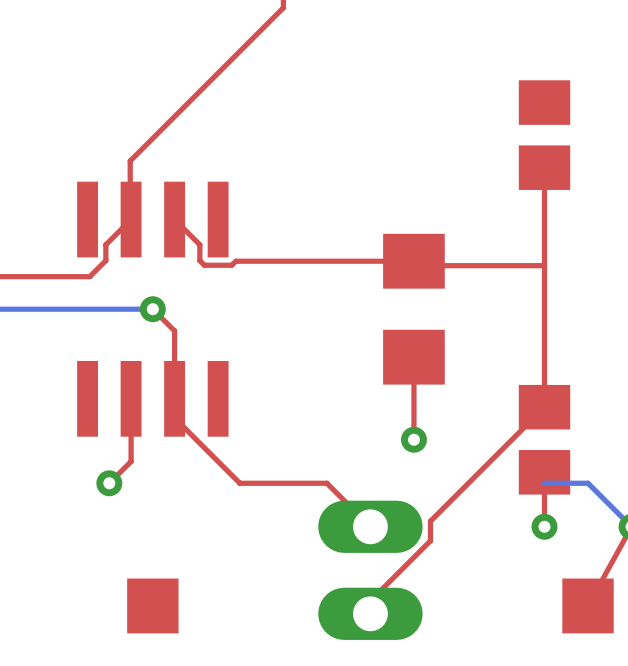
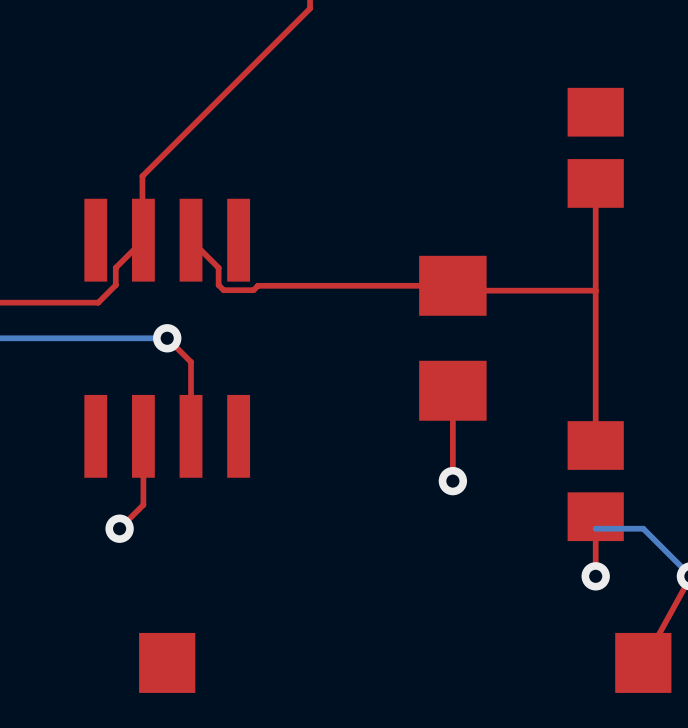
top track: (174, 398) (174, 417) (239, 483) (326, 483) (370, 526) -> none
top track: (544, 407) (430, 521) (430, 540) (370, 600) (370, 613) -> none
part: (370, 570) -> none

